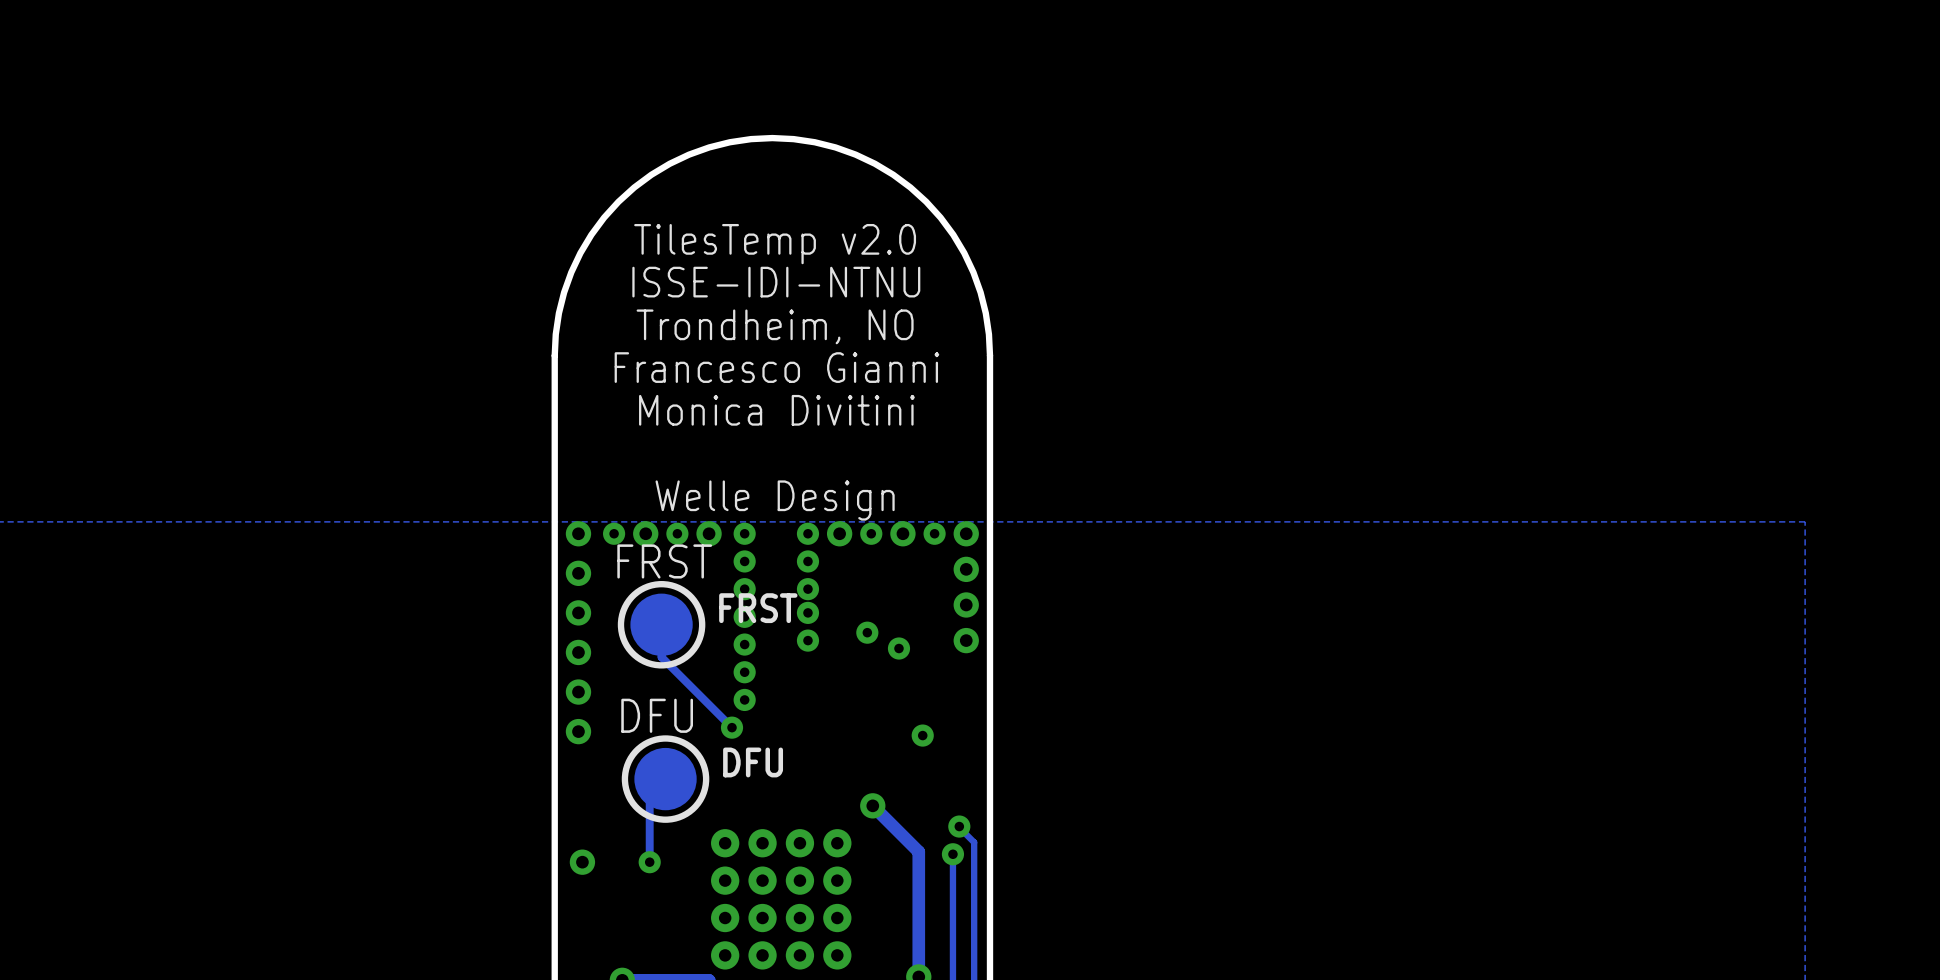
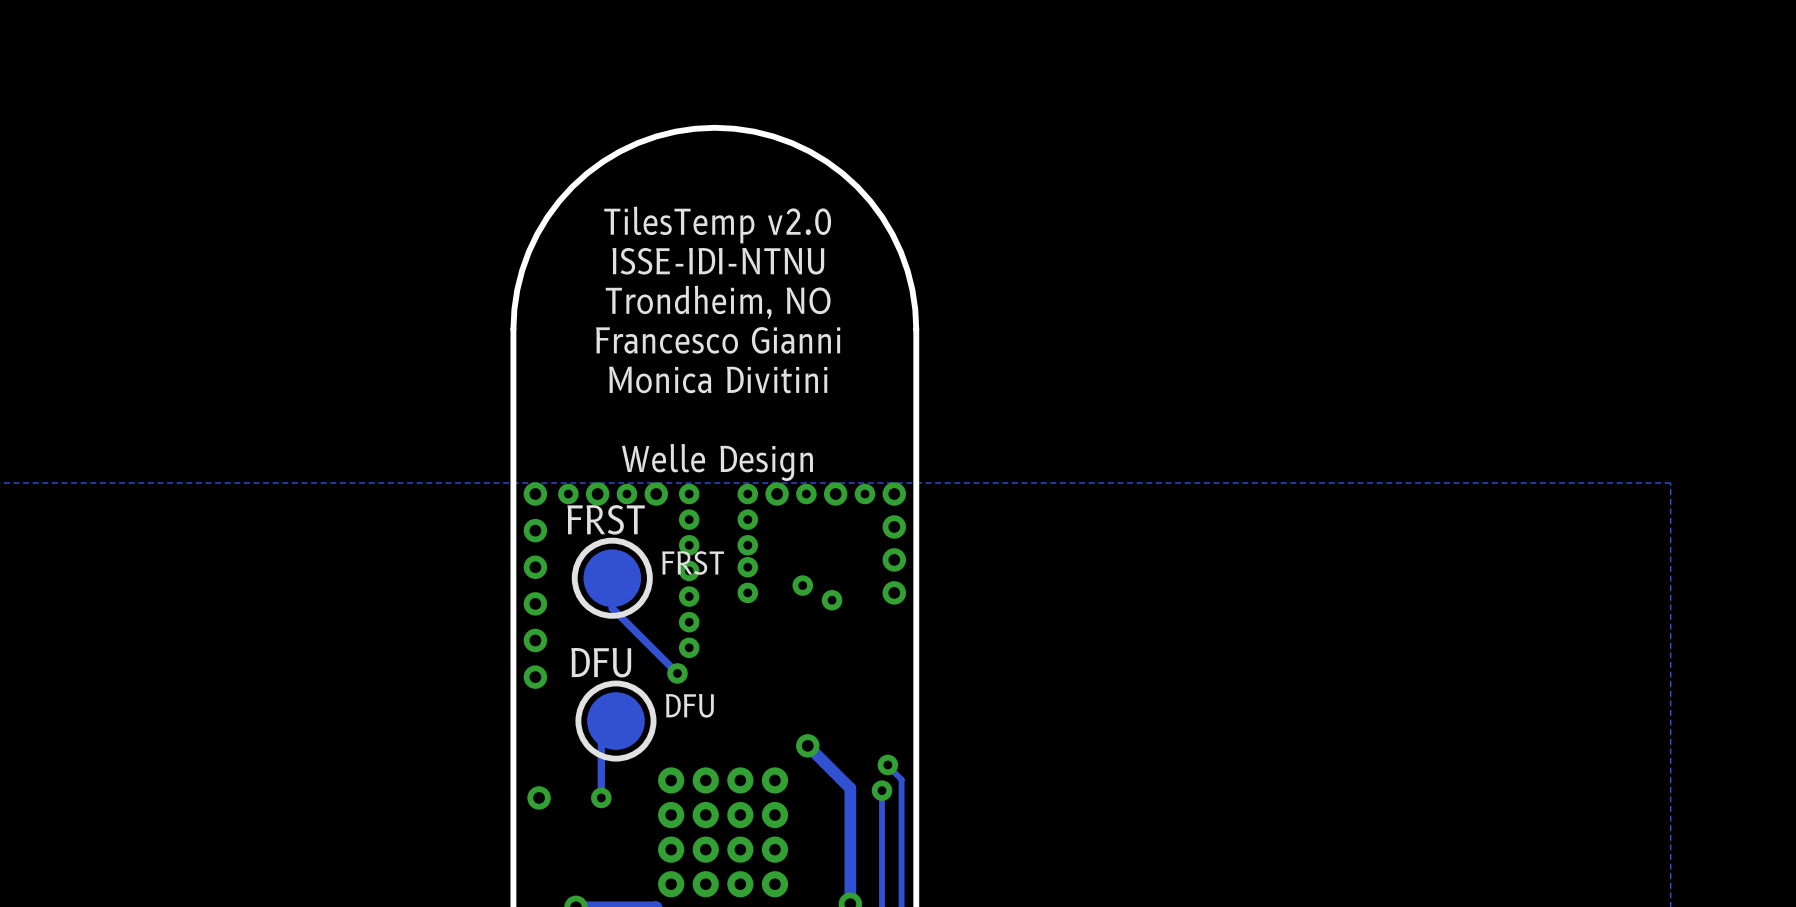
via: (922, 735) -> none

